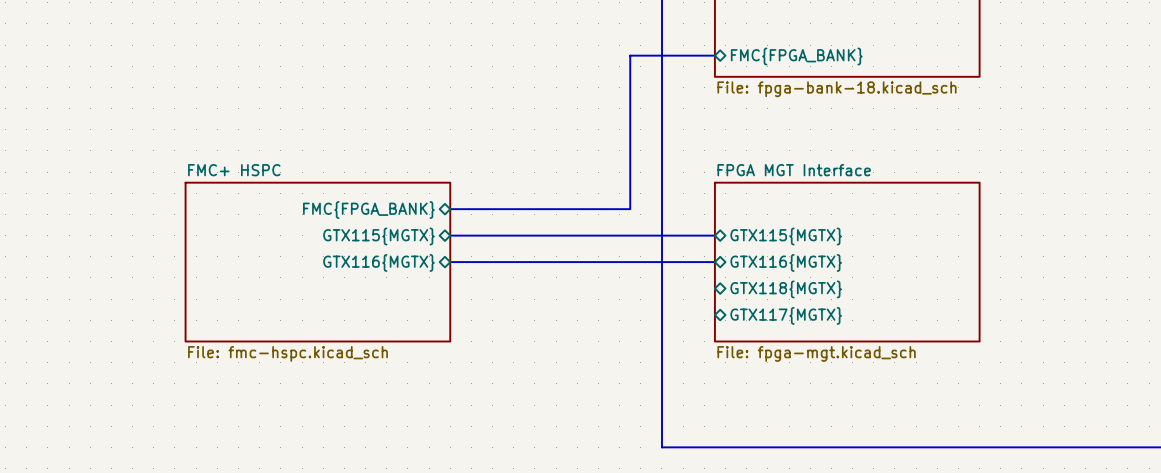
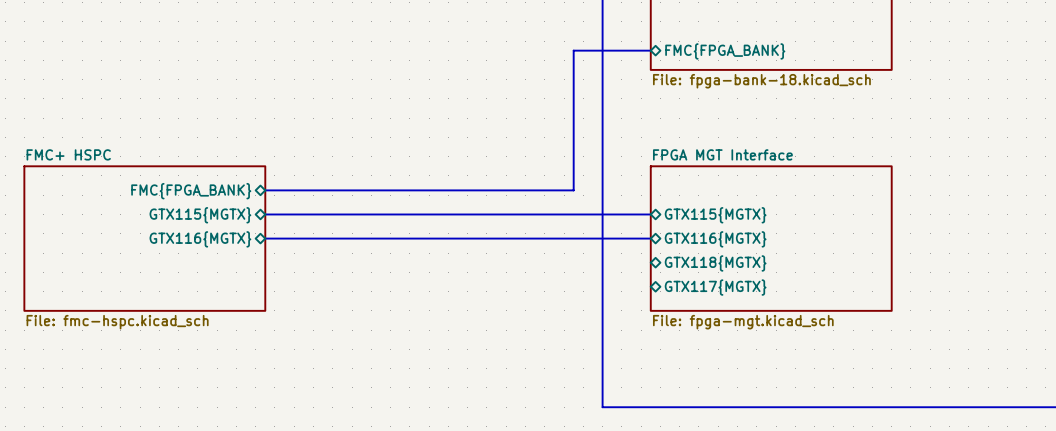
bus: none -> (265, 190) (409, 190)
sheet pin position: FMC{FPGA_BANK} (368, 210) -> FMC{FPGA_BANK} (191, 191)
bus: none -> (265, 214) (409, 214)
sheet pin position: GTX115{MGTX} (378, 236) -> GTX115{MGTX} (200, 215)
bus: none -> (265, 238) (409, 238)
sheet FMC+ HSPC position: (317, 262) -> (144, 238)
sheet pin position: GTX116{MGTX} (378, 262) -> GTX116{MGTX} (200, 239)

